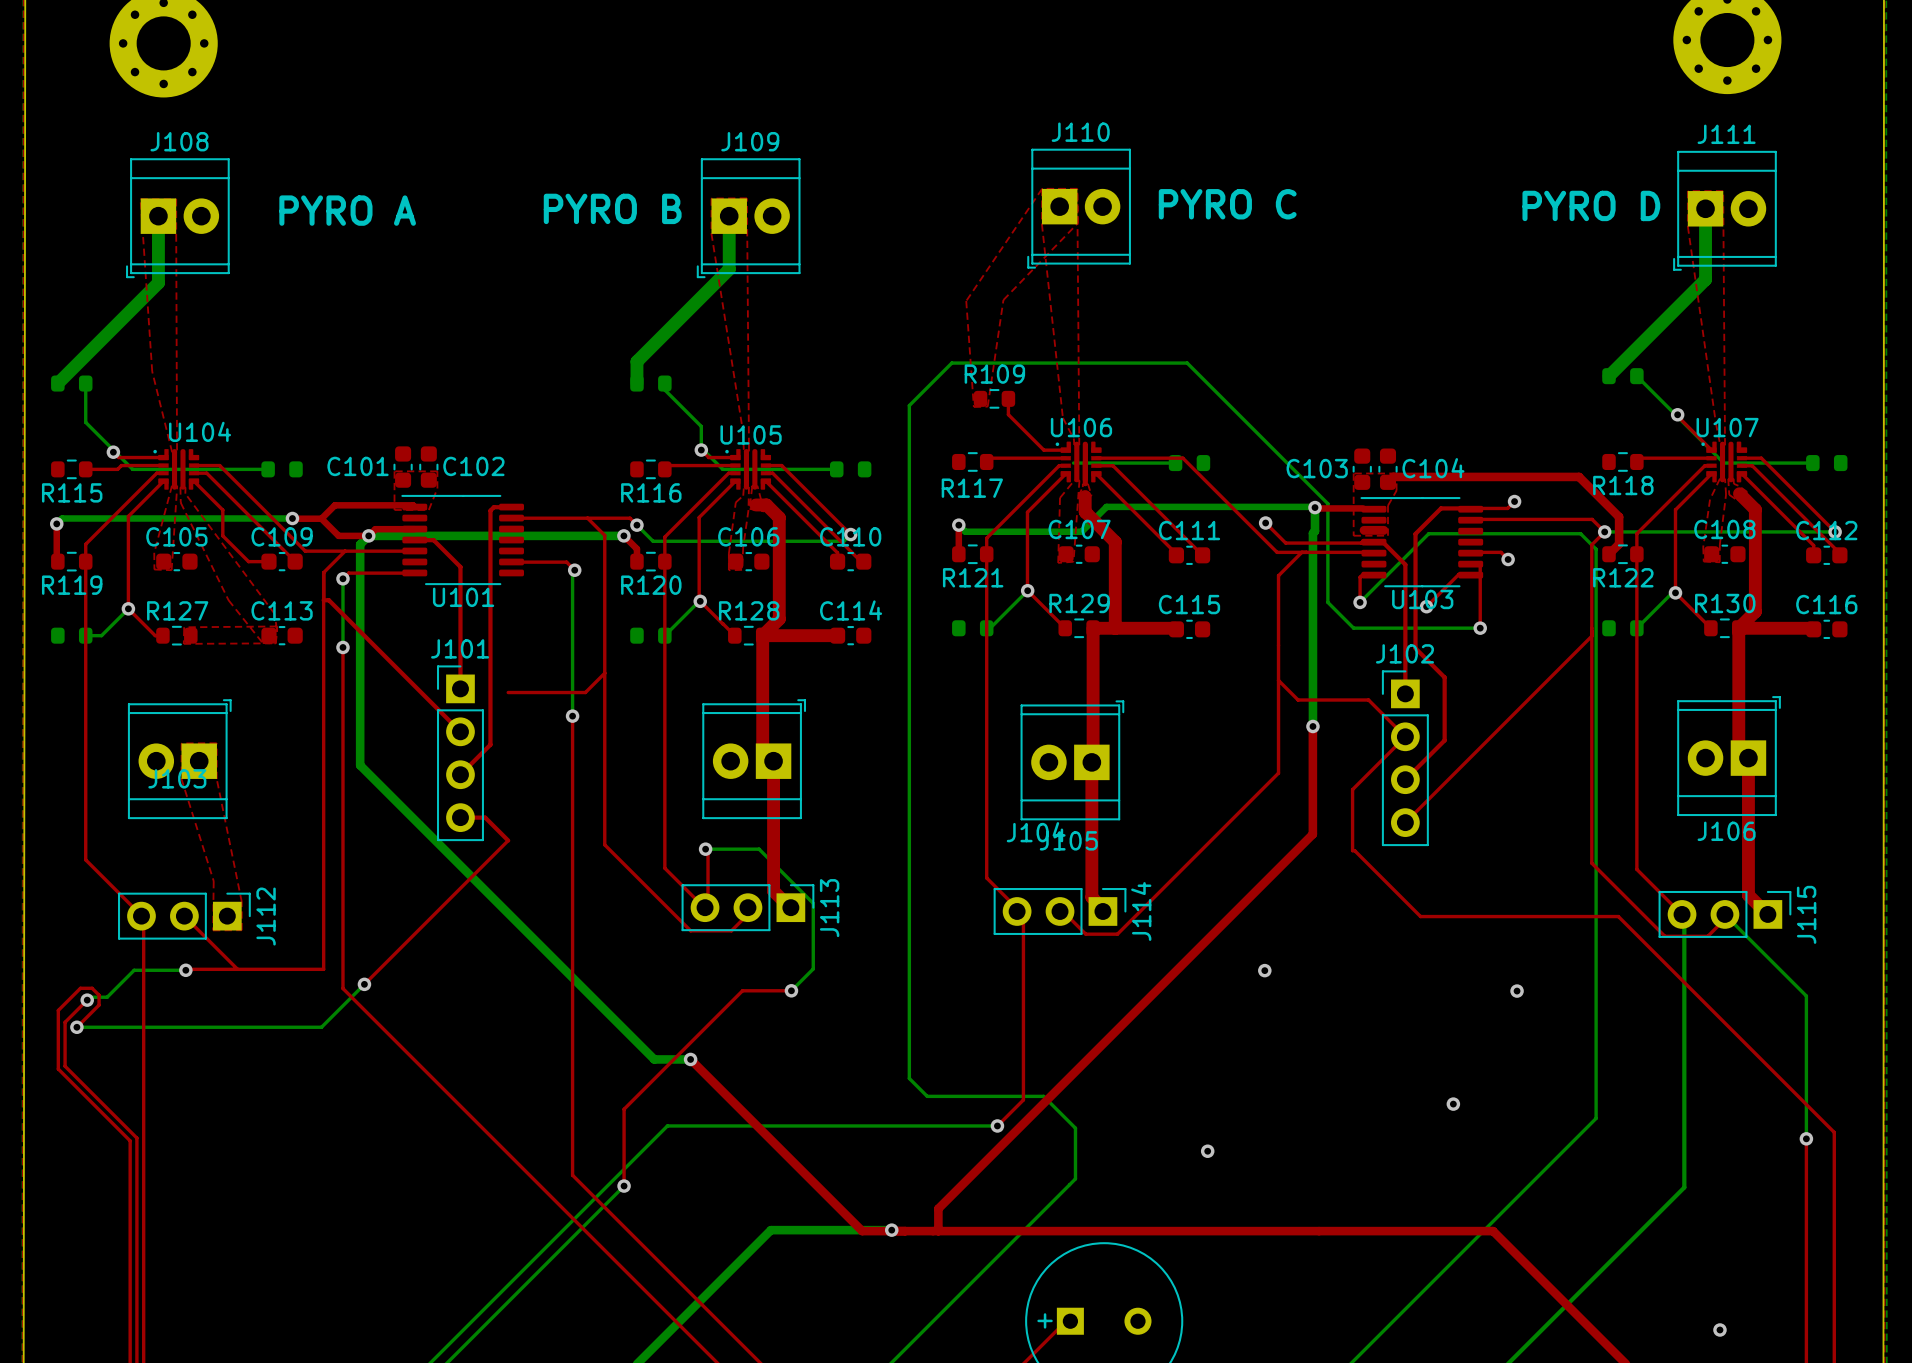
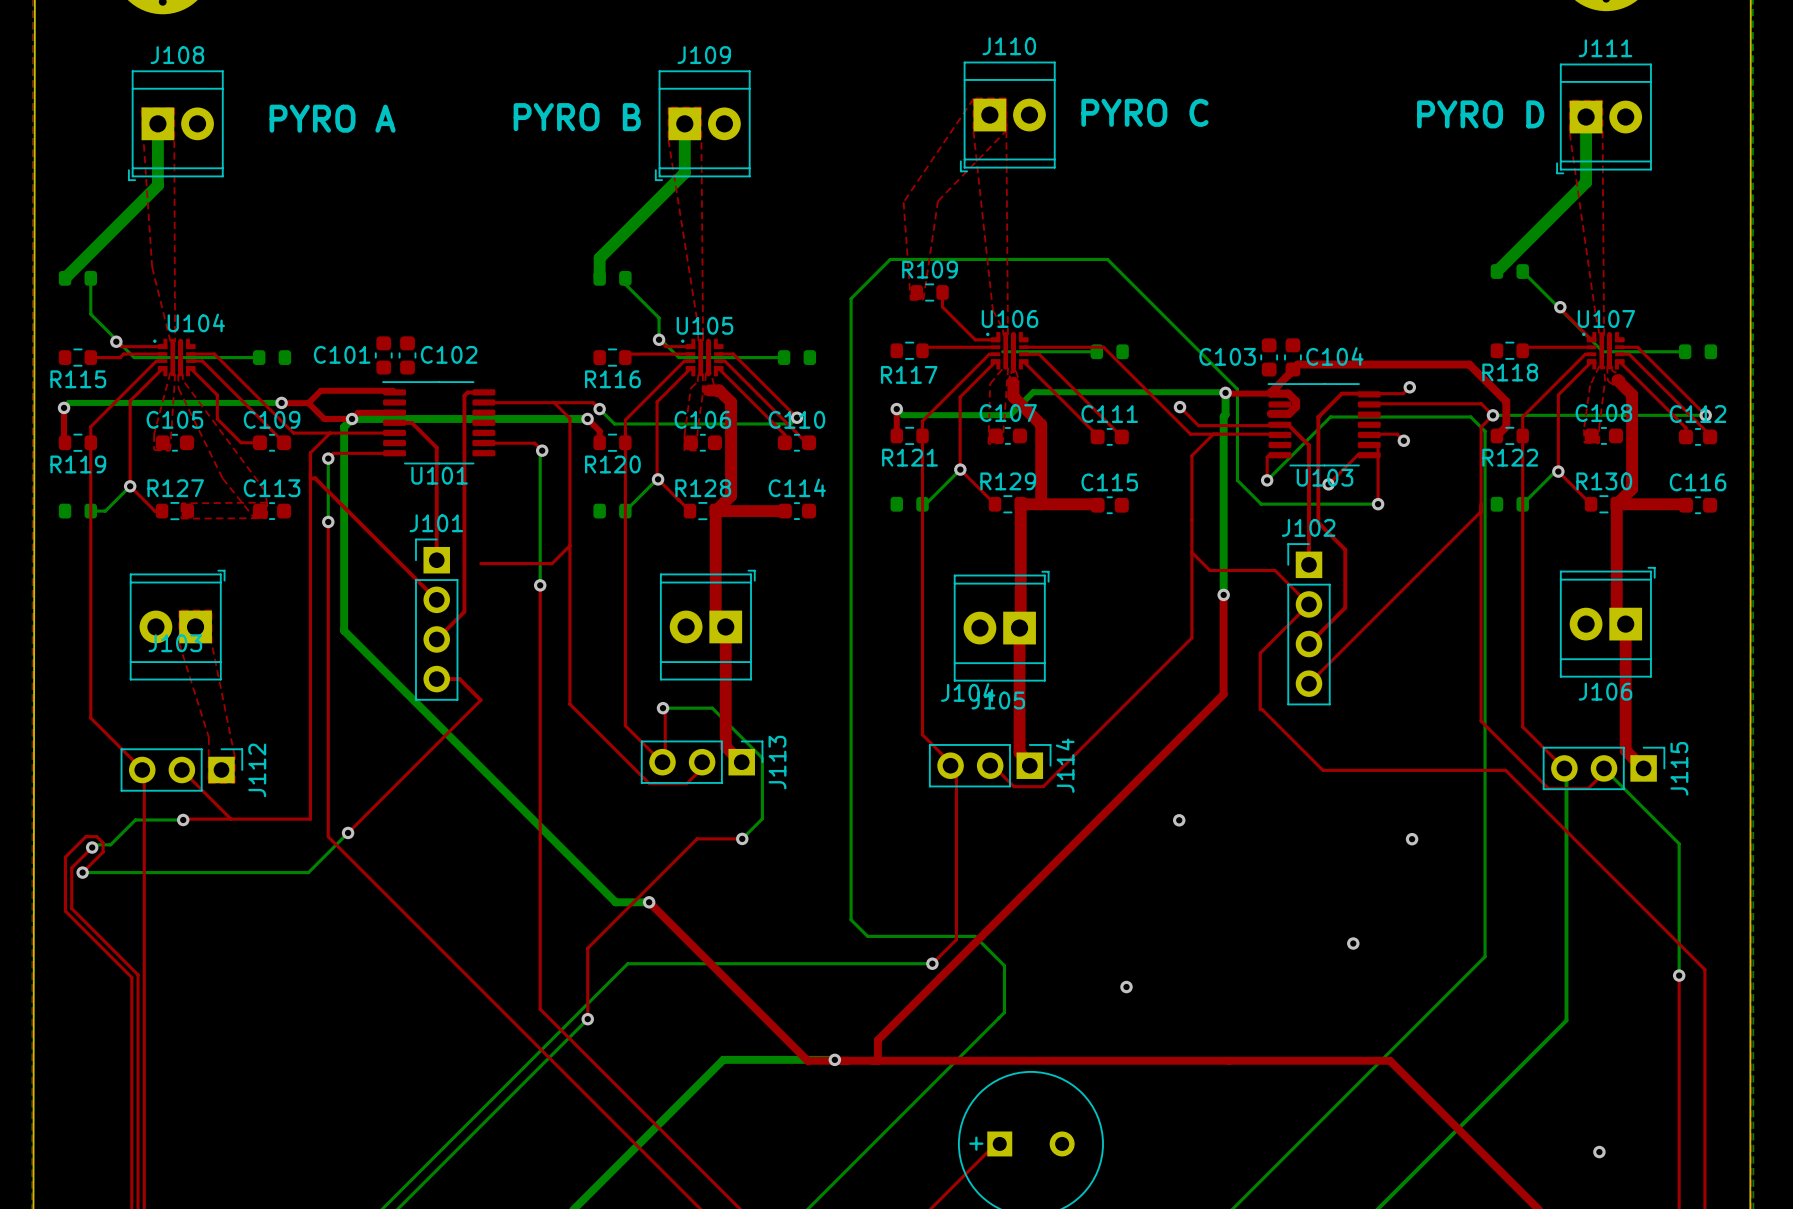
top zone outline: (394, 471) (394, 509) (428, 509) (437, 488) (437, 471) (394, 471) -> none
top zone outline: (1353, 473) (1353, 535) (1387, 535) (1387, 505) (1396, 490) (1396, 473) (1353, 473) -> none
top track: none -> (1292, 371) (1270, 392) (1288, 393) (1296, 401) (1296, 406) (1289, 413)

